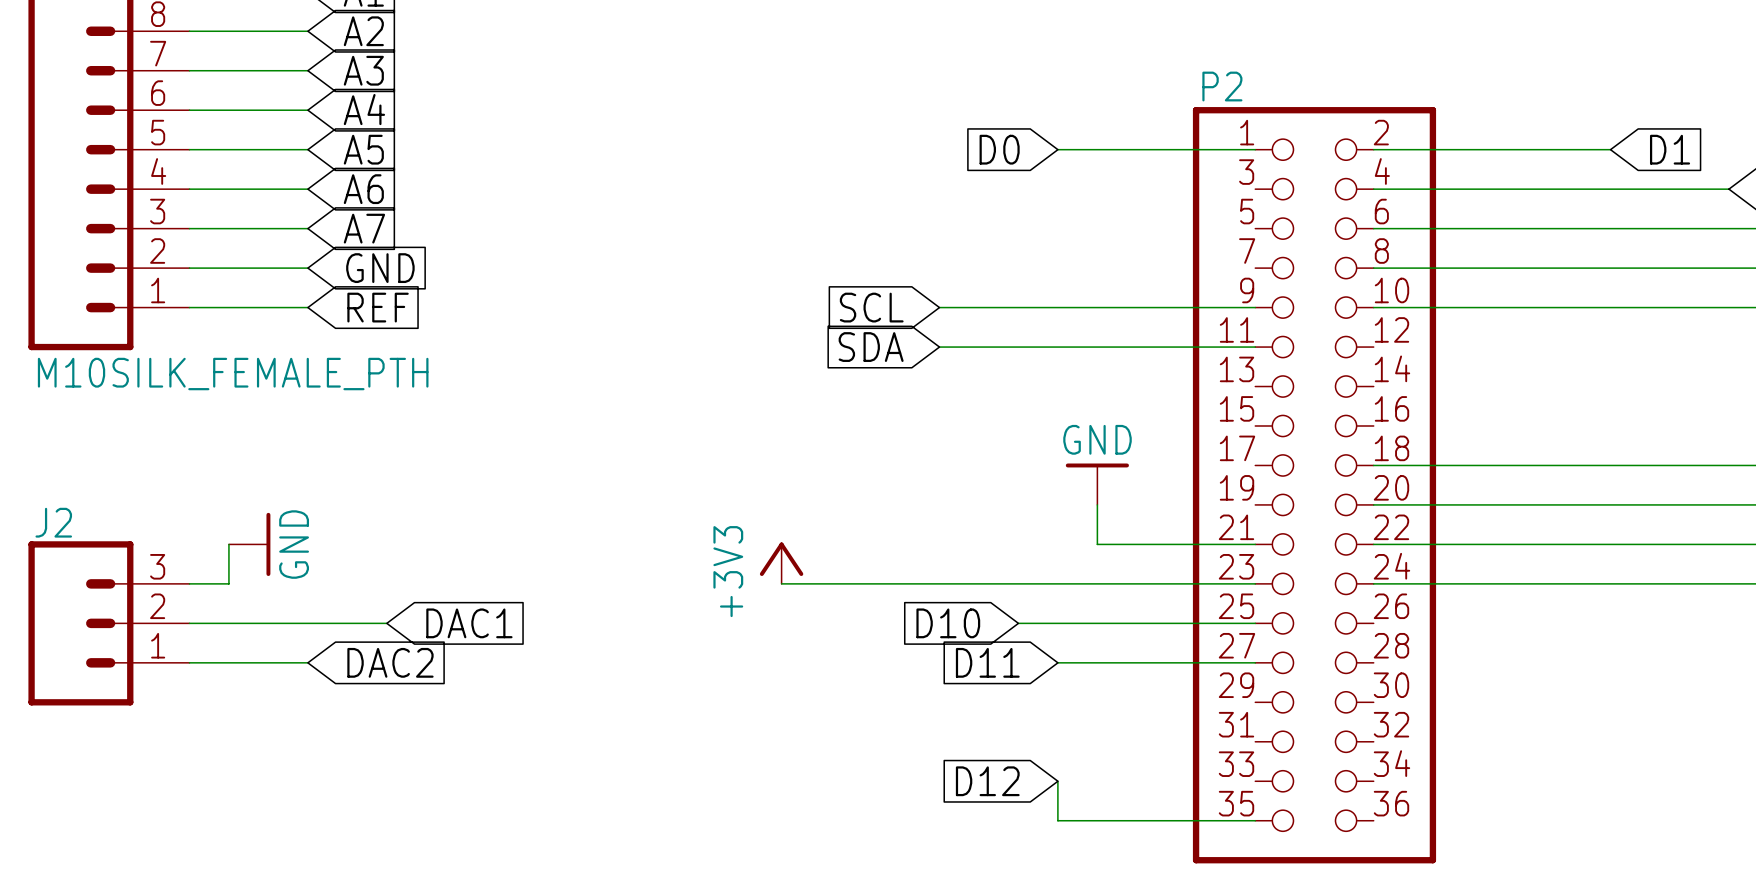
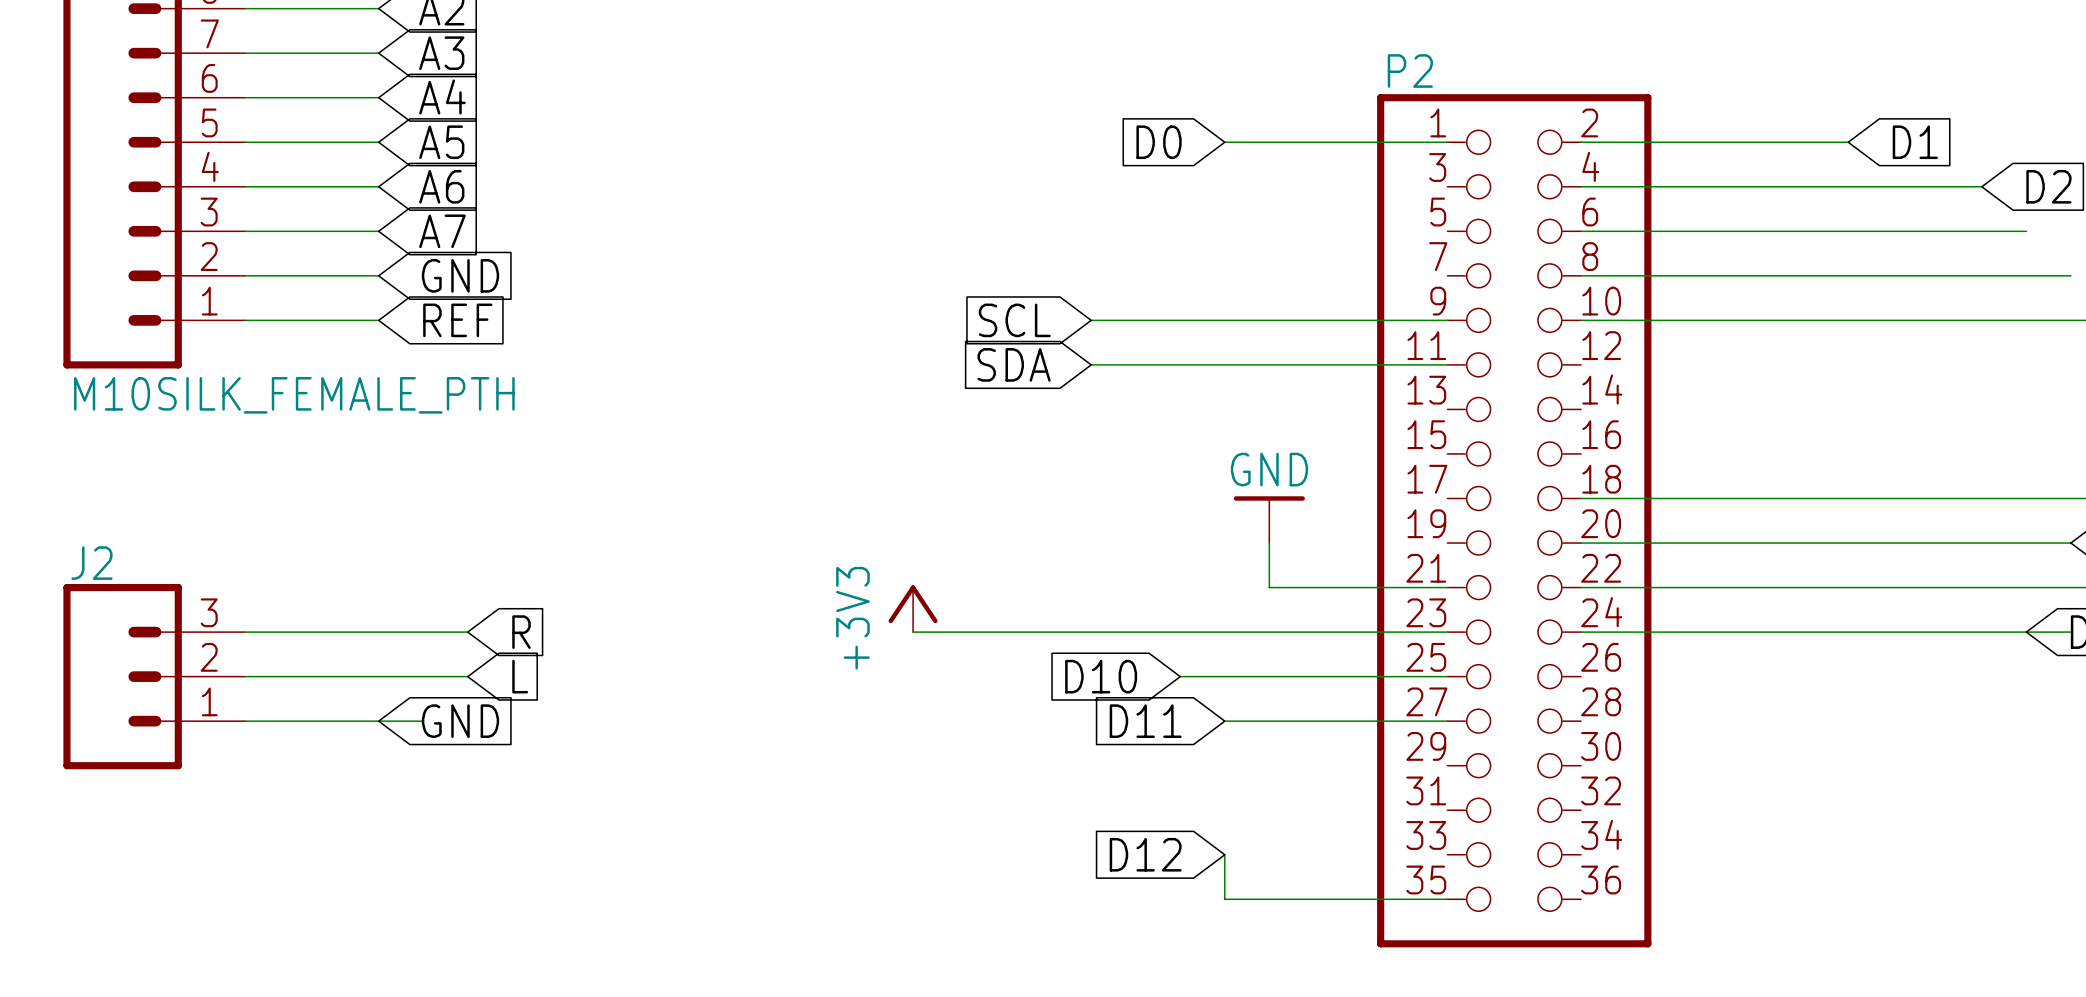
wire: (228, 544) (228, 583) -> (467, 632) (289, 632)
power symbol: GND (249, 544) -> none
global label: none -> R (521, 632)
global label: DAC1 (469, 623) -> L (520, 676)
wire: none -> (378, 721) (423, 721)
global label: DAC2 (390, 662) -> GND (460, 721)

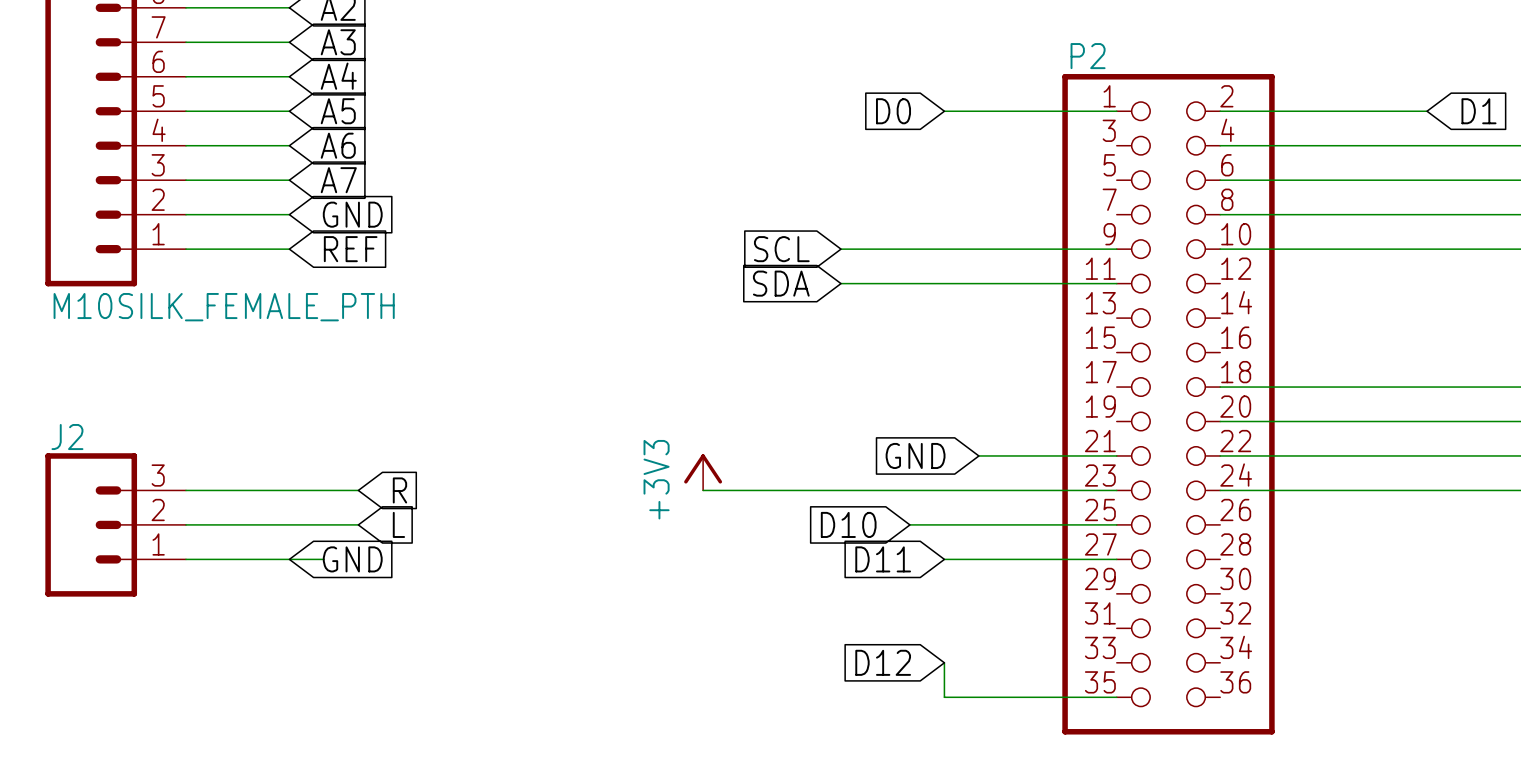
power symbol: GND (1269, 519) -> none
wire: (1269, 543) (1269, 587) -> none
global label: none -> GND (915, 455)

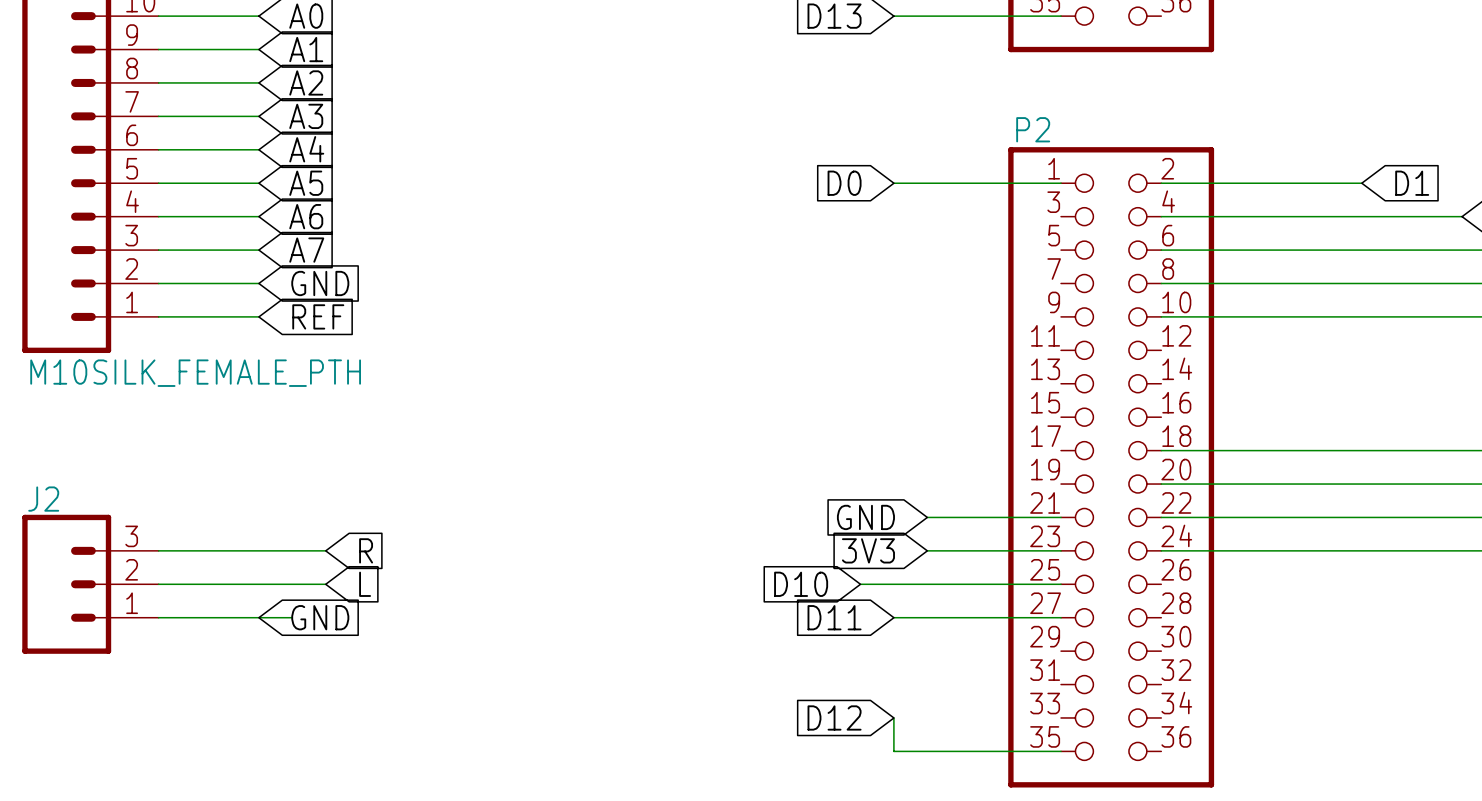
global label: SCL (781, 249) -> none
wire: (840, 249) (1116, 249) -> none
global label: SDA (781, 283) -> none
wire: (840, 283) (1116, 283) -> none
power symbol: +3V3 (703, 472) -> none
wire: (703, 490) (978, 490) -> none
global label: none -> 3V3 (868, 550)

